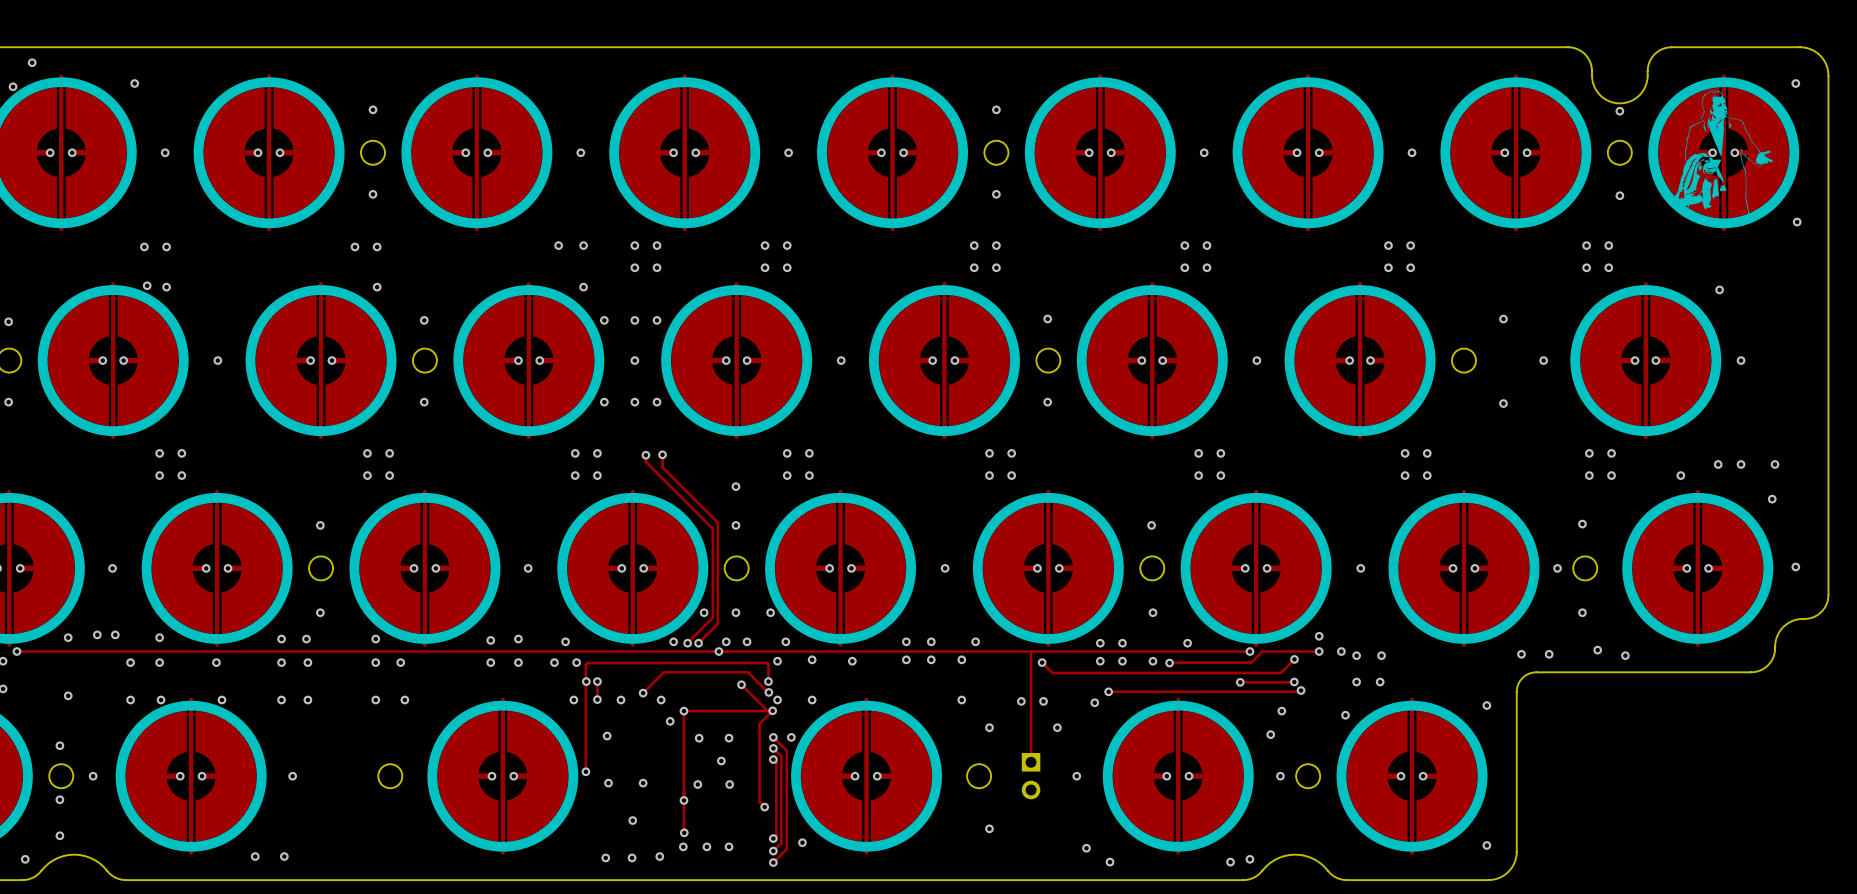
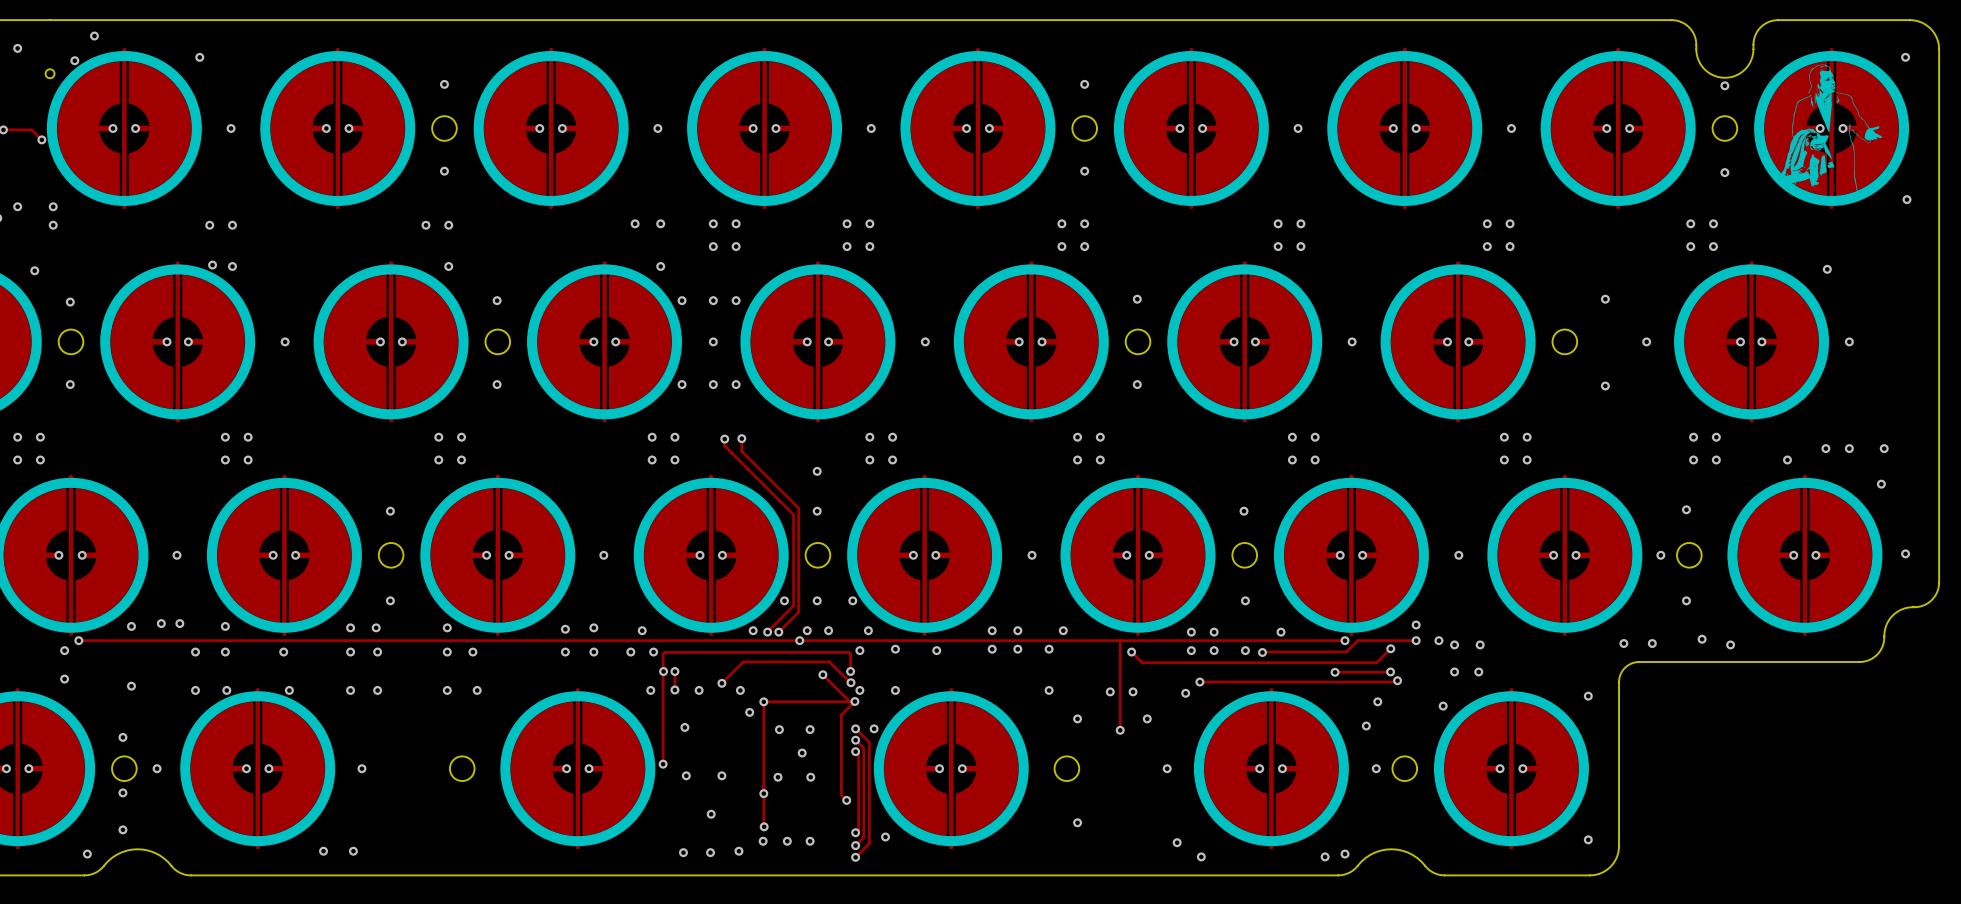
track: (1031, 738) (1031, 762) -> none
via: none -> (1120, 730)
part: (1031, 776) -> none

